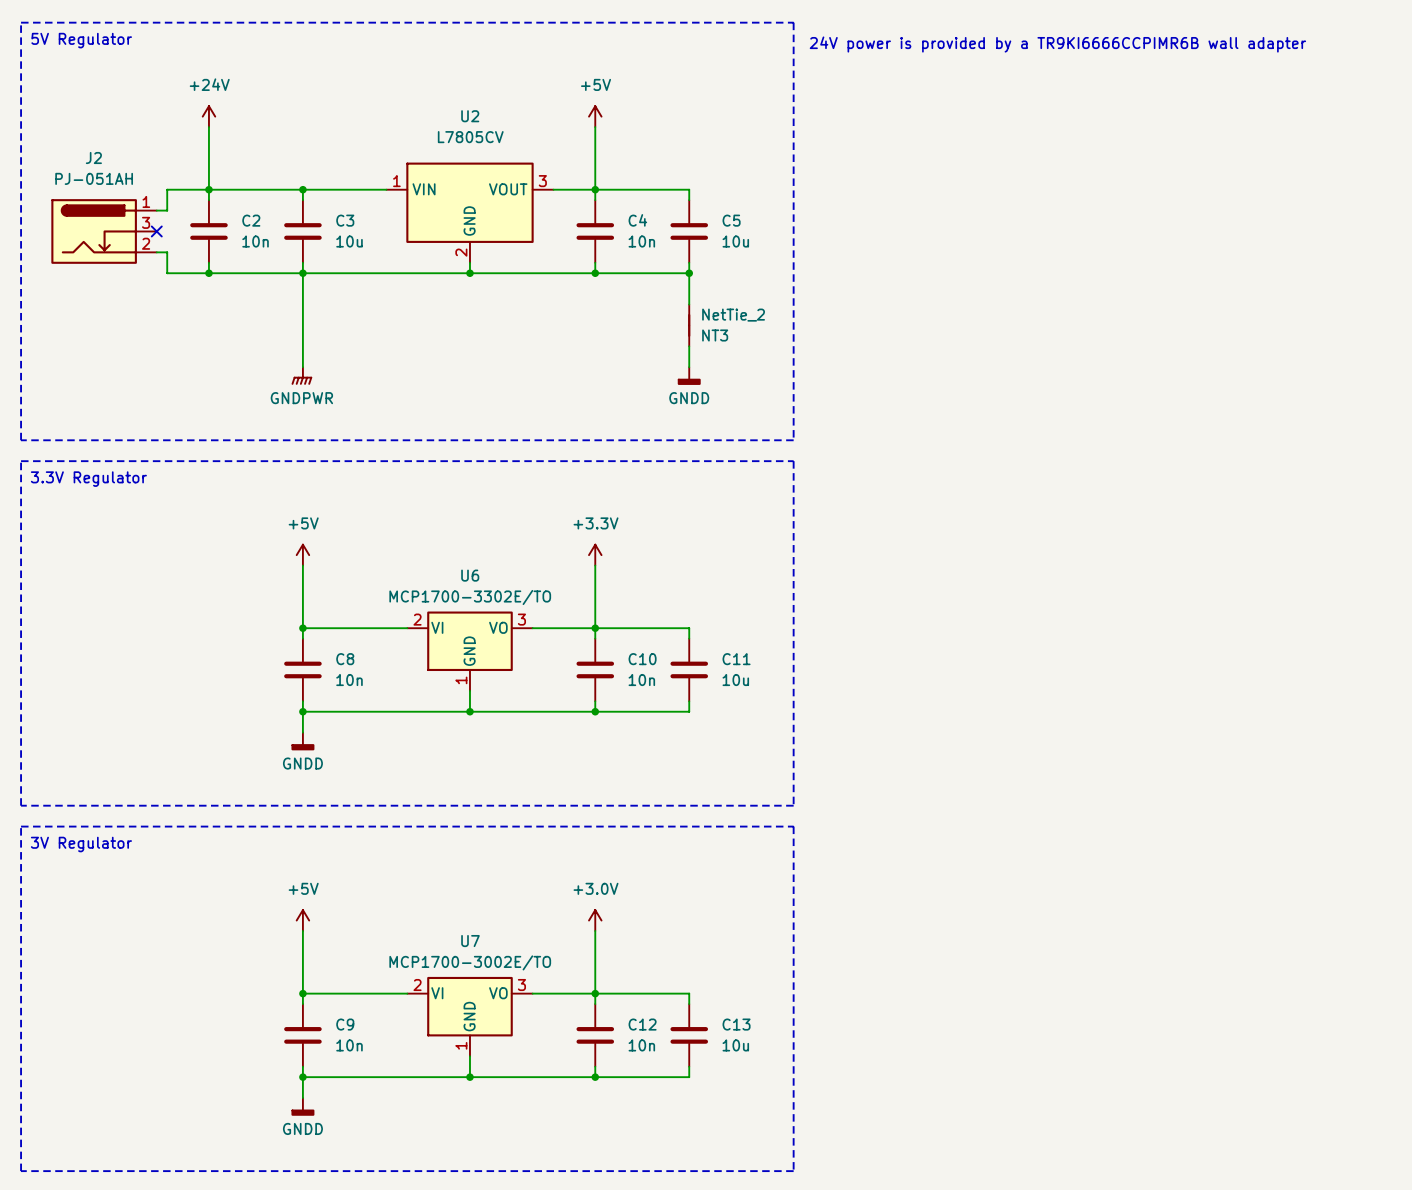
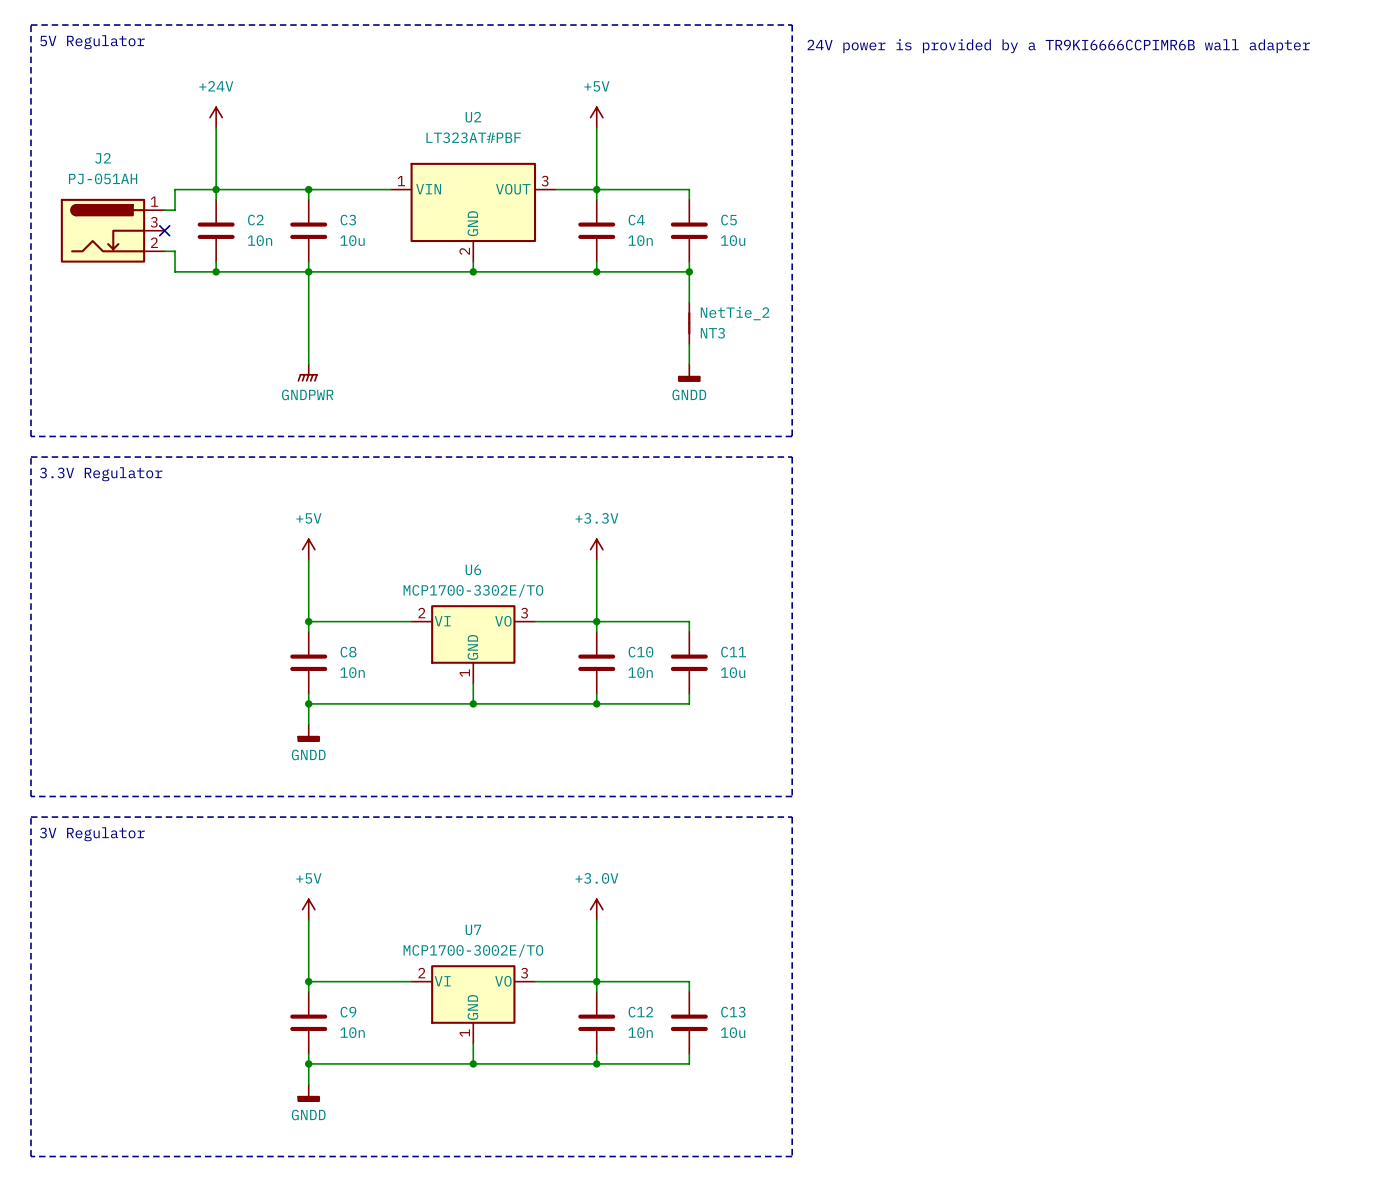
U2 value: L7805CV (470, 137) -> LT323AT#PBF (473, 137)

